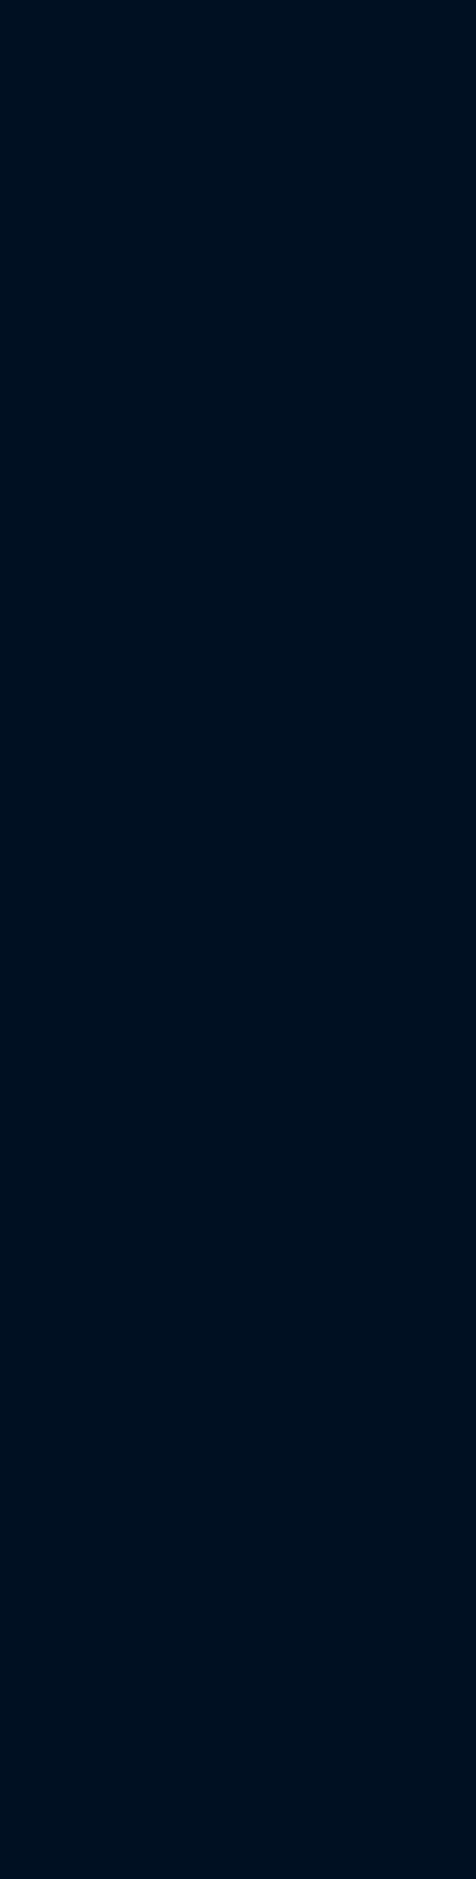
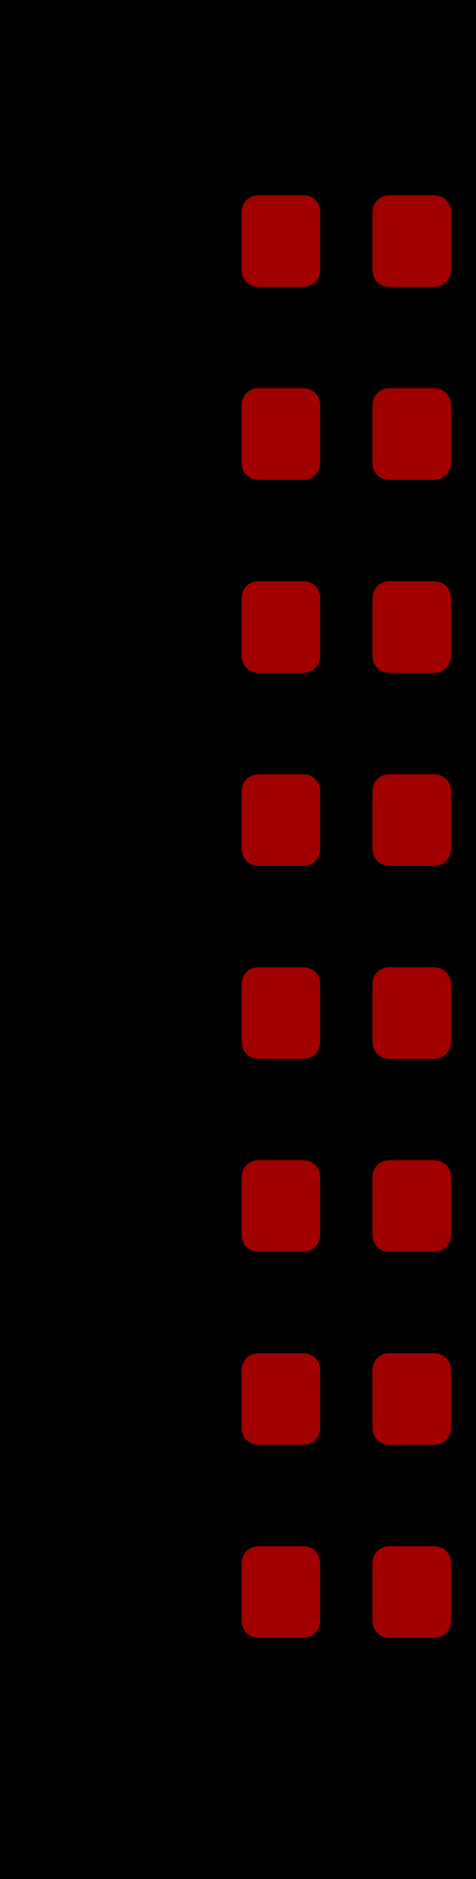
part: none -> (346, 241)
part: none -> (346, 434)
part: none -> (346, 627)
part: none -> (346, 820)
part: none -> (346, 1013)
part: none -> (346, 1206)
part: none -> (346, 1399)
part: none -> (346, 1592)

